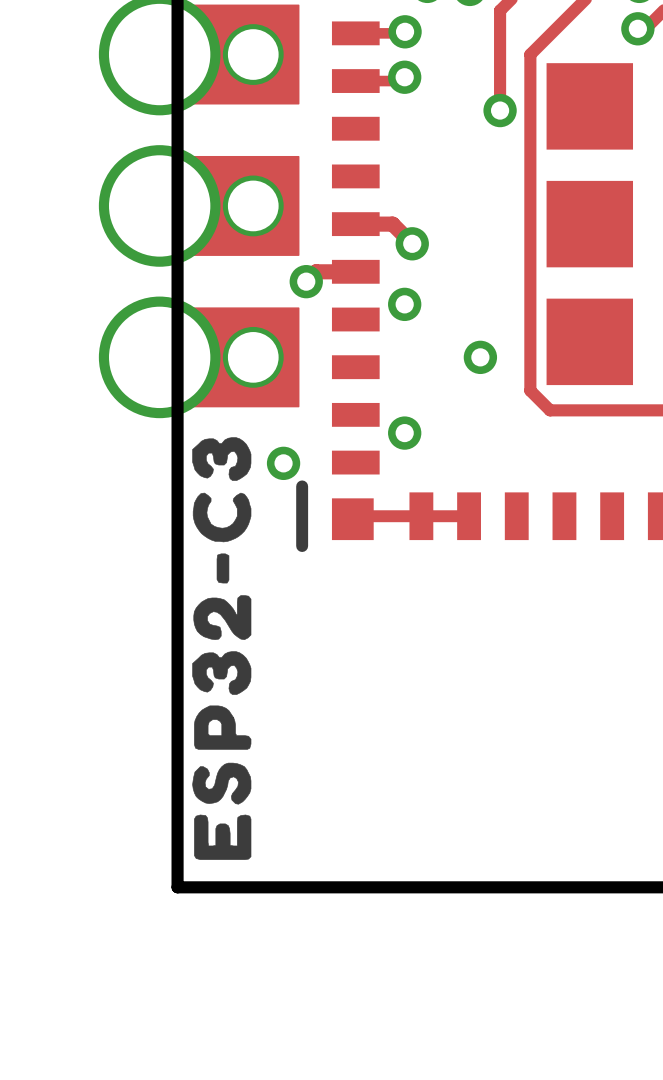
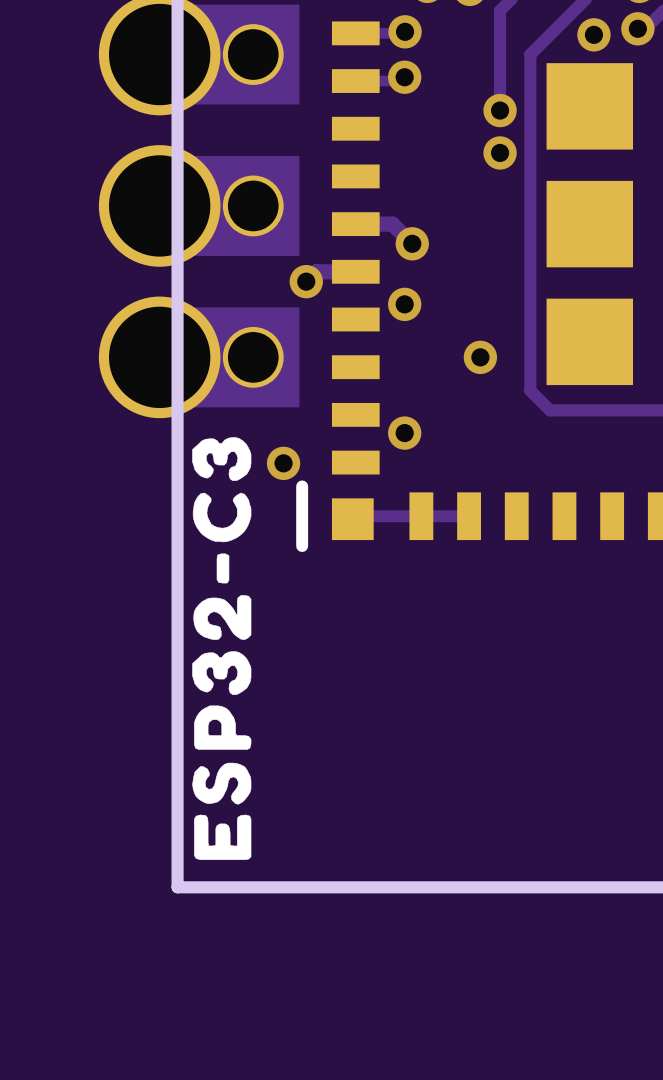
via: none -> (593, 34)
via: none -> (500, 152)

